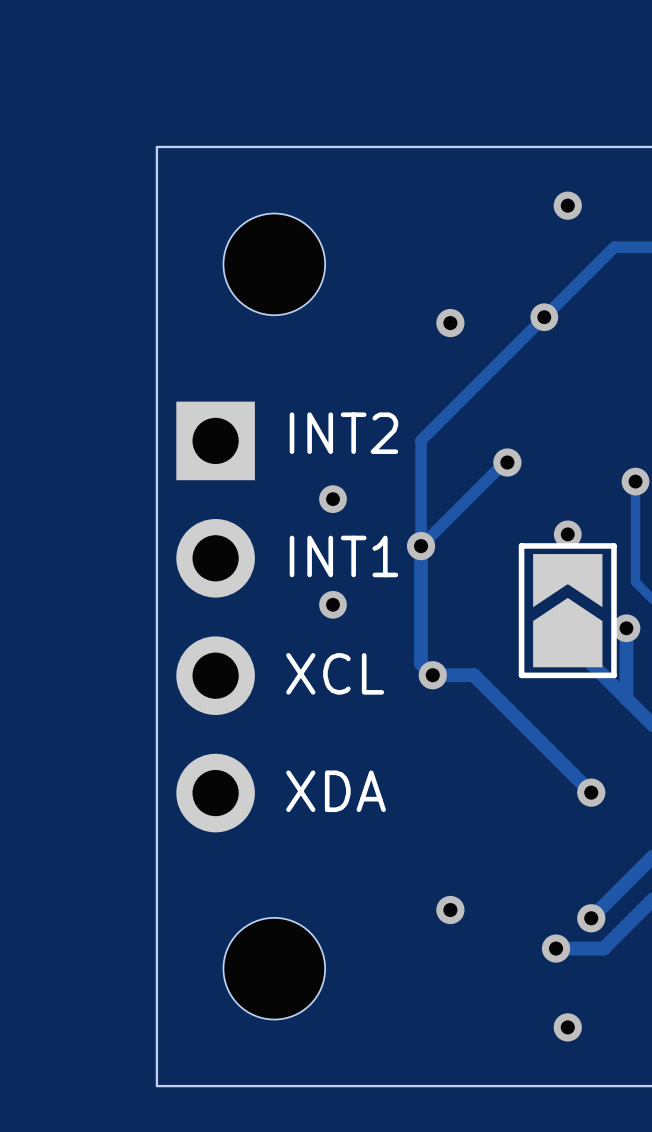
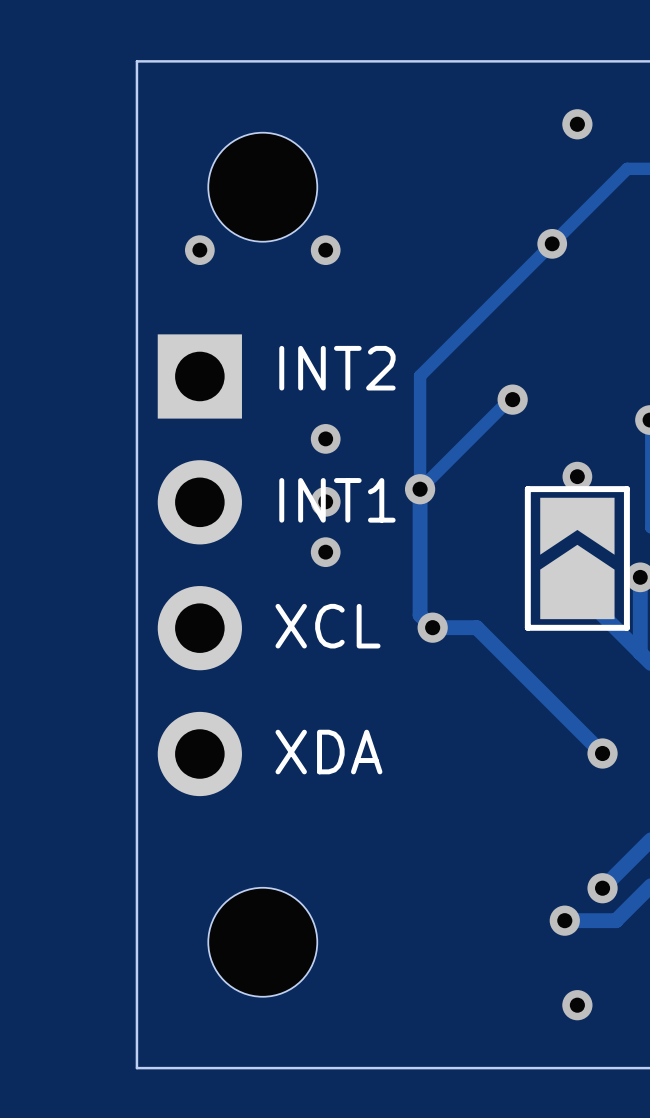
via: none -> (199, 250)
via: none -> (325, 250)
via: (450, 323) -> none
via: none -> (325, 501)
via: (450, 910) -> none

